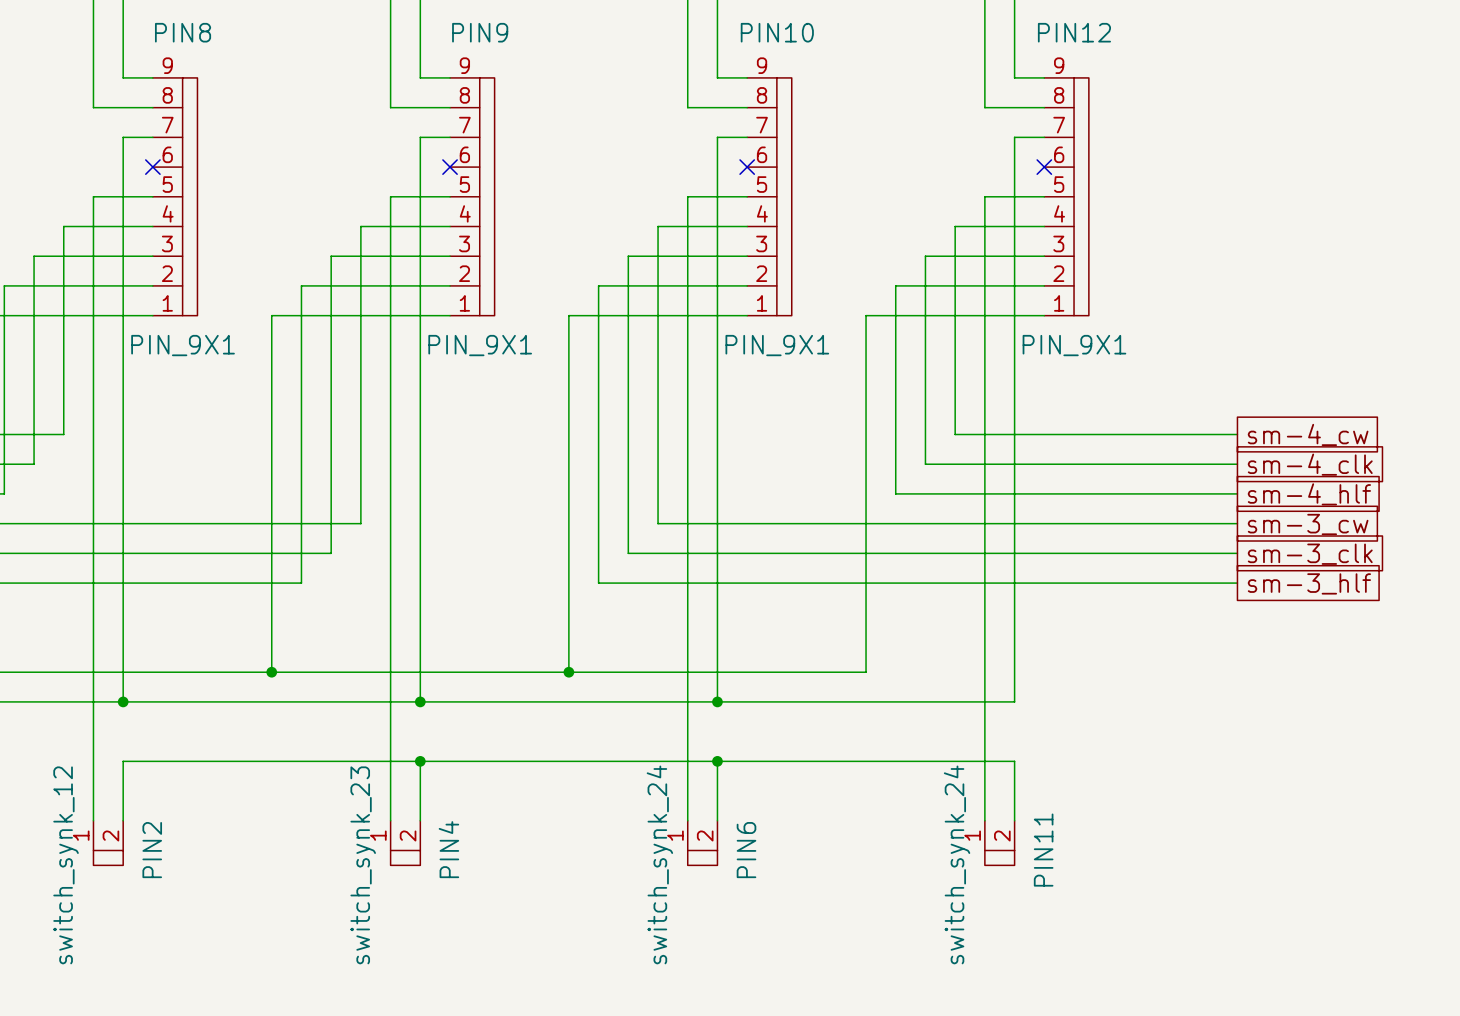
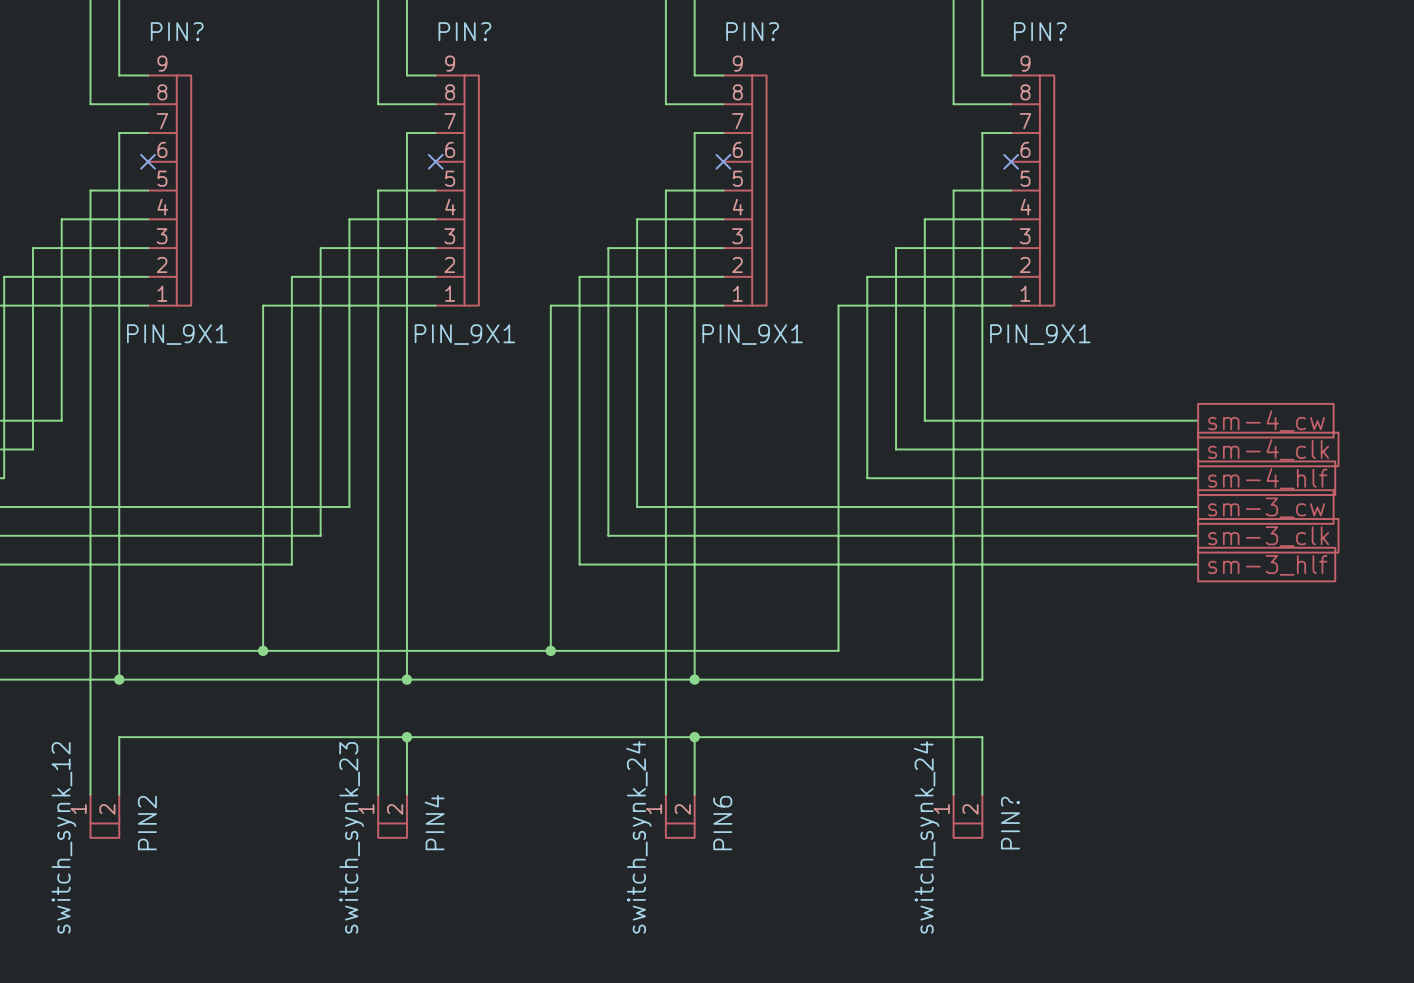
PIN8 name: PIN8 (183, 32) -> PIN? (177, 31)
PIN9 name: PIN9 (480, 32) -> PIN? (464, 31)
PIN10 name: PIN10 (777, 32) -> PIN? (752, 31)
PIN12 name: PIN12 (1074, 32) -> PIN? (1040, 31)
PIN11 name: PIN11 (1043, 850) -> PIN? (1010, 823)

